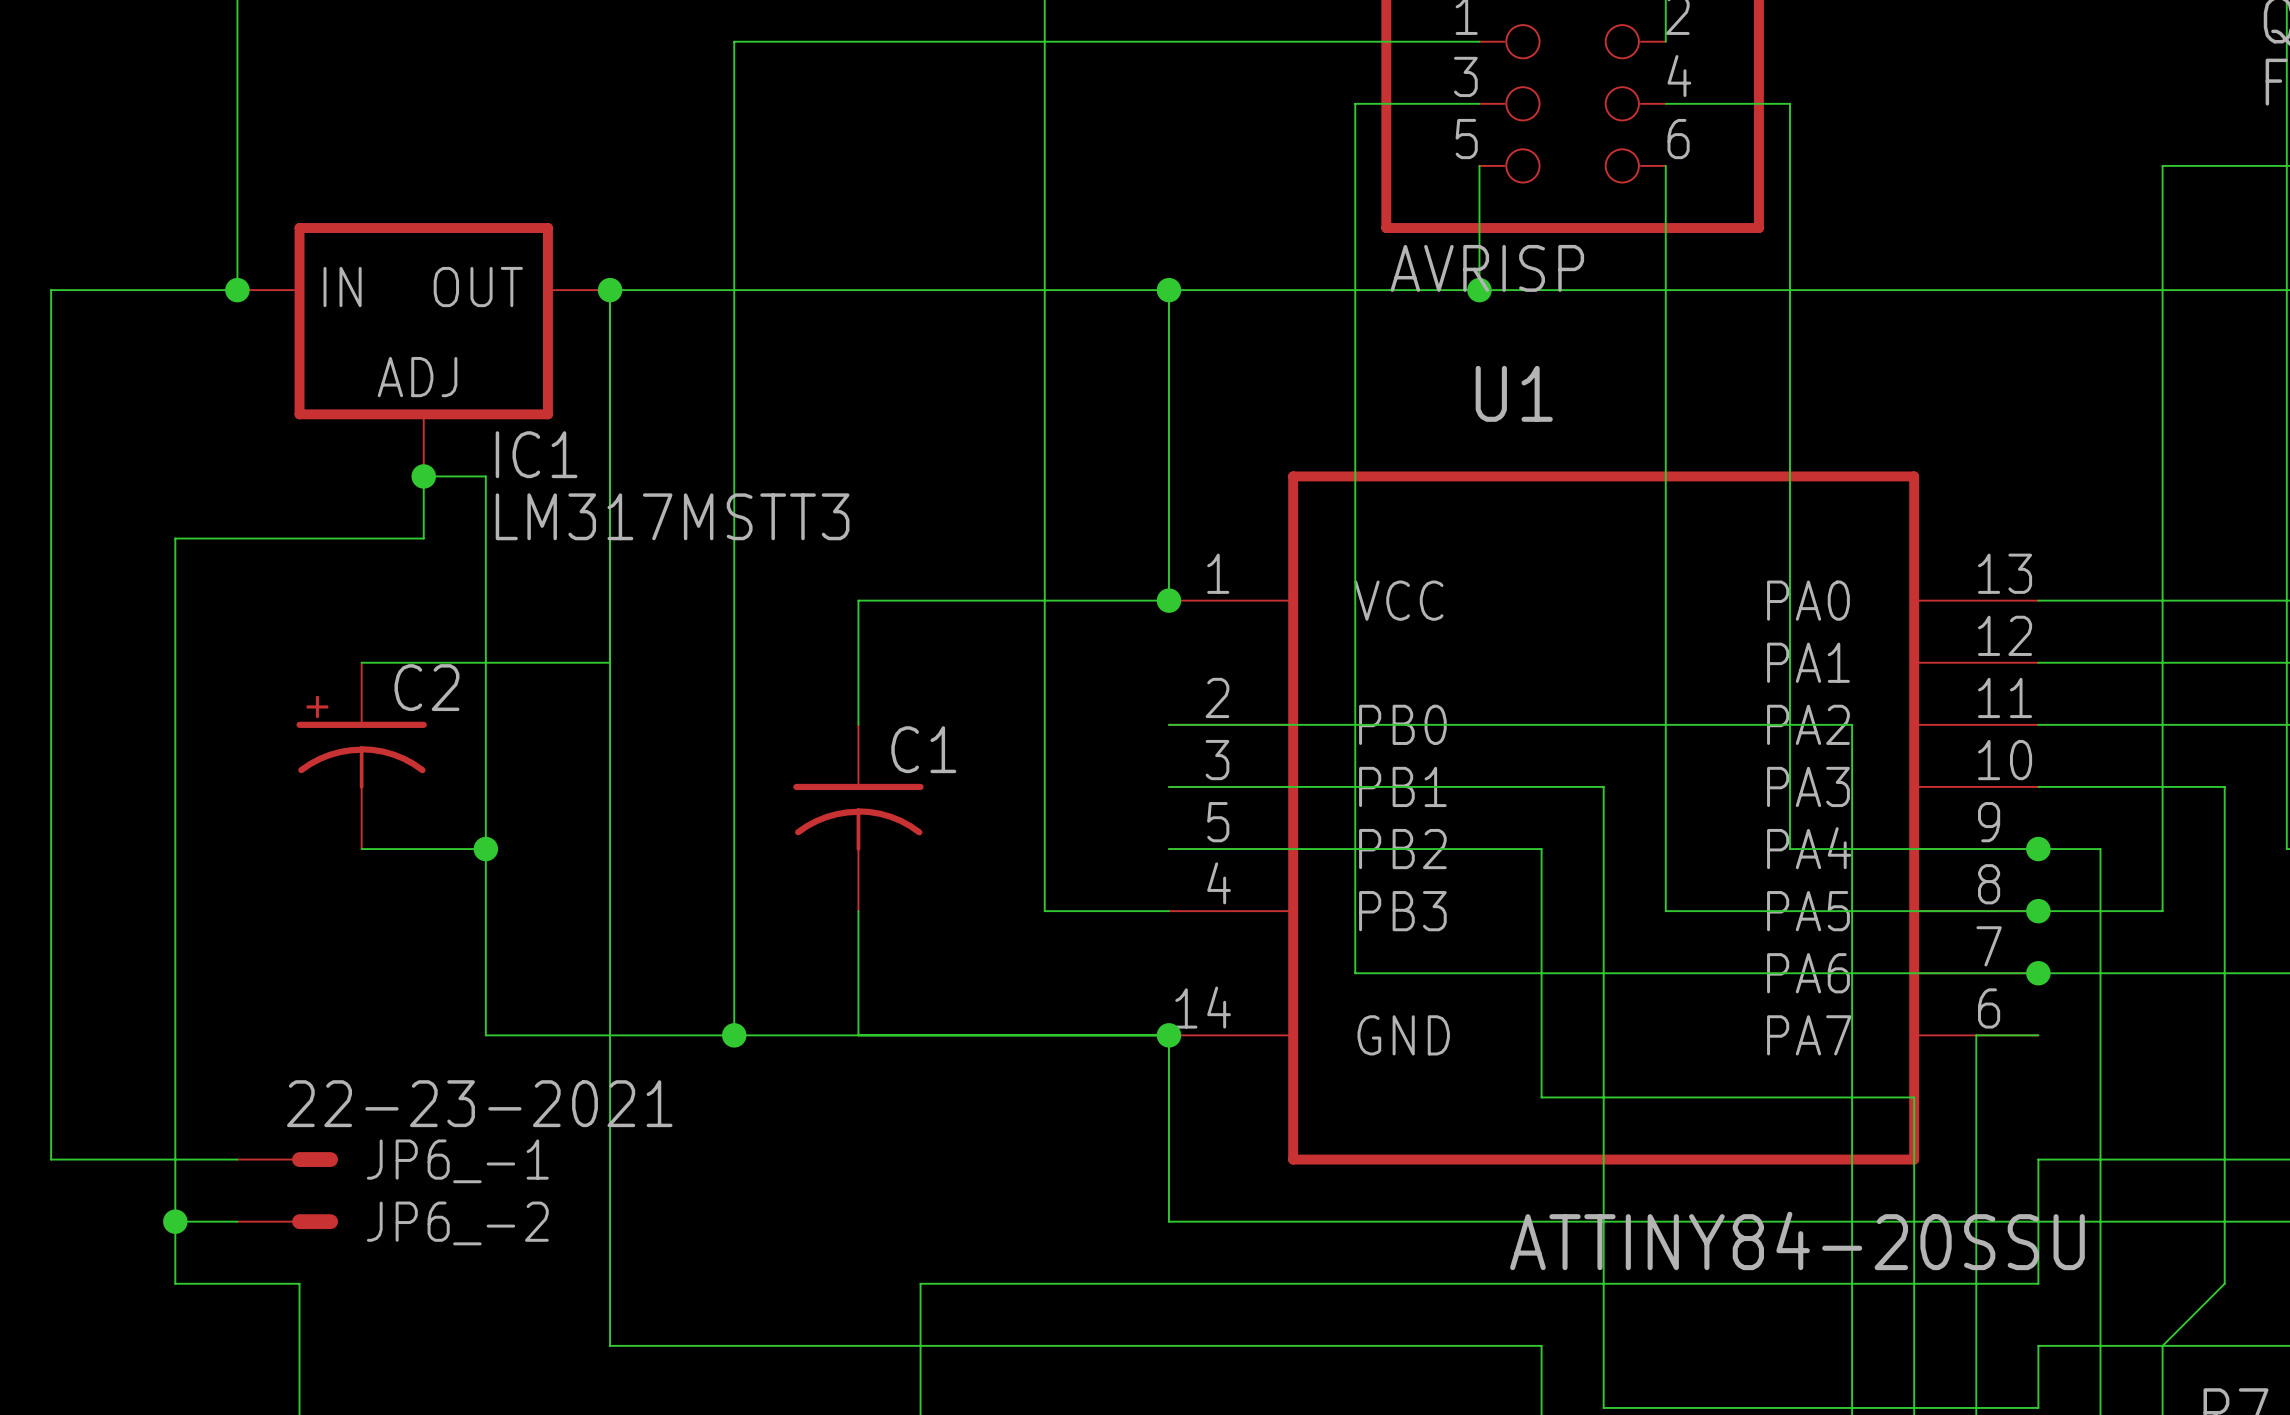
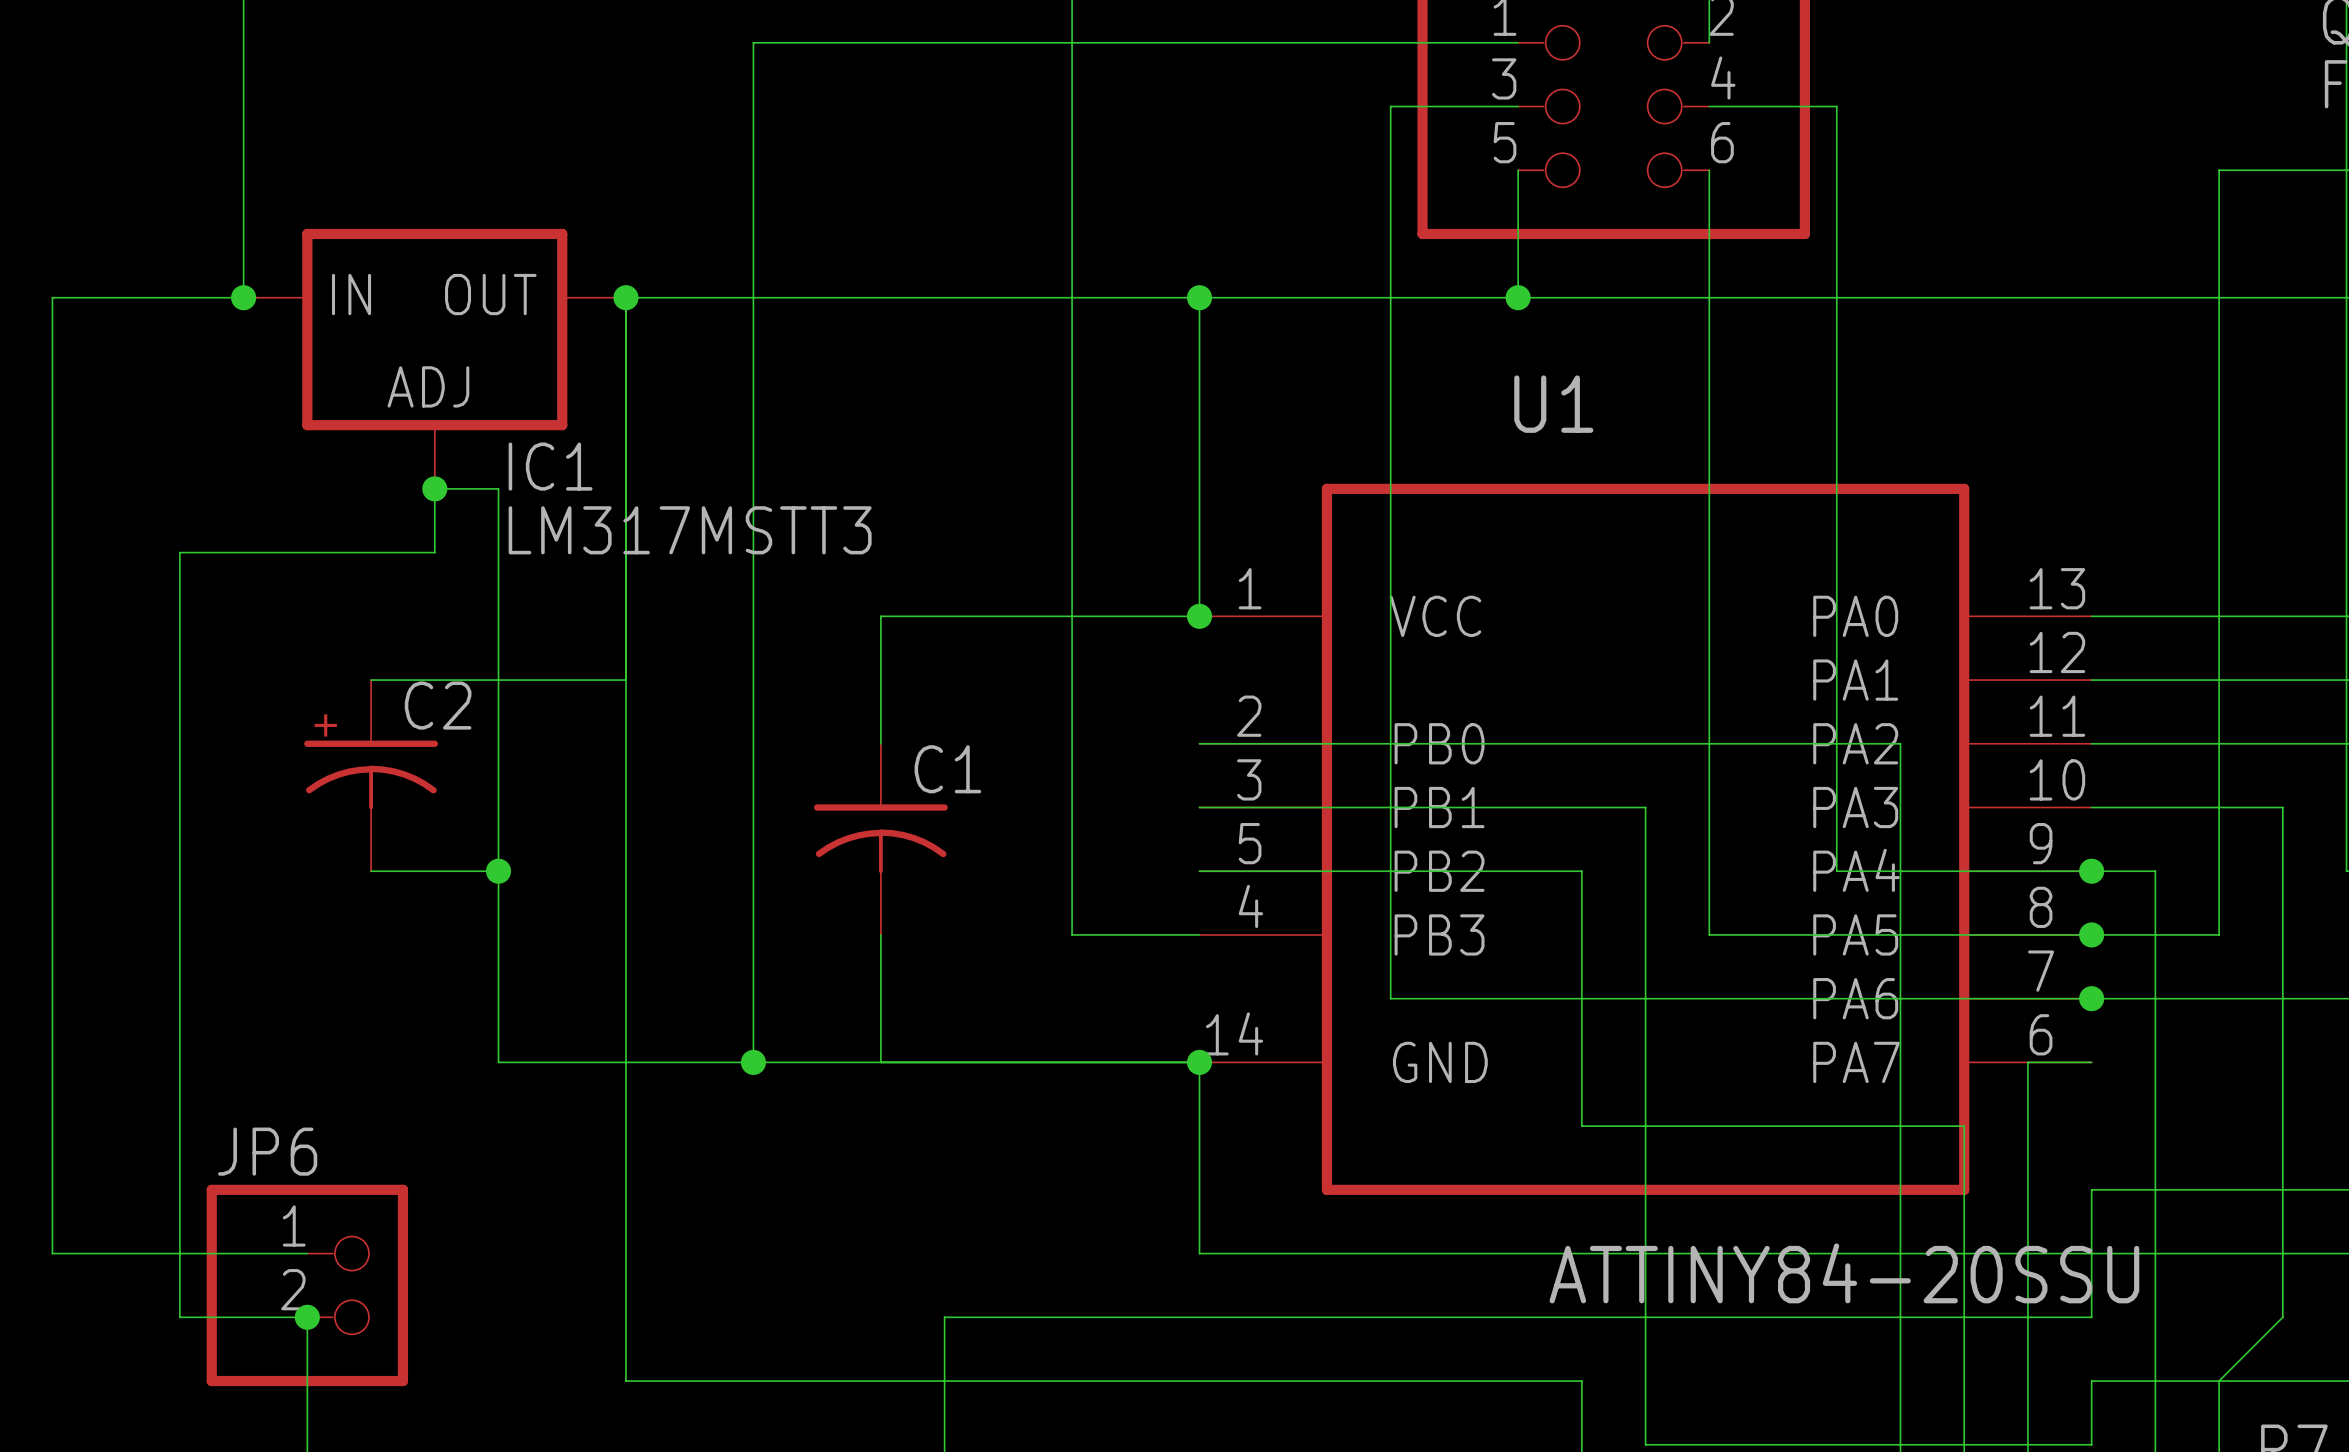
part value: AVRISP (1487, 268) -> none
wire: (51, 1159) (237, 1159) -> (52, 1189) (52, 1253) (179, 1253)
JP6_-1: 22-23-2021 (287, 1159) -> none
junction position: (175, 1221) -> (307, 1317)
JP6_-2: (287, 1221) -> none
JP6: none -> (307, 1285)

